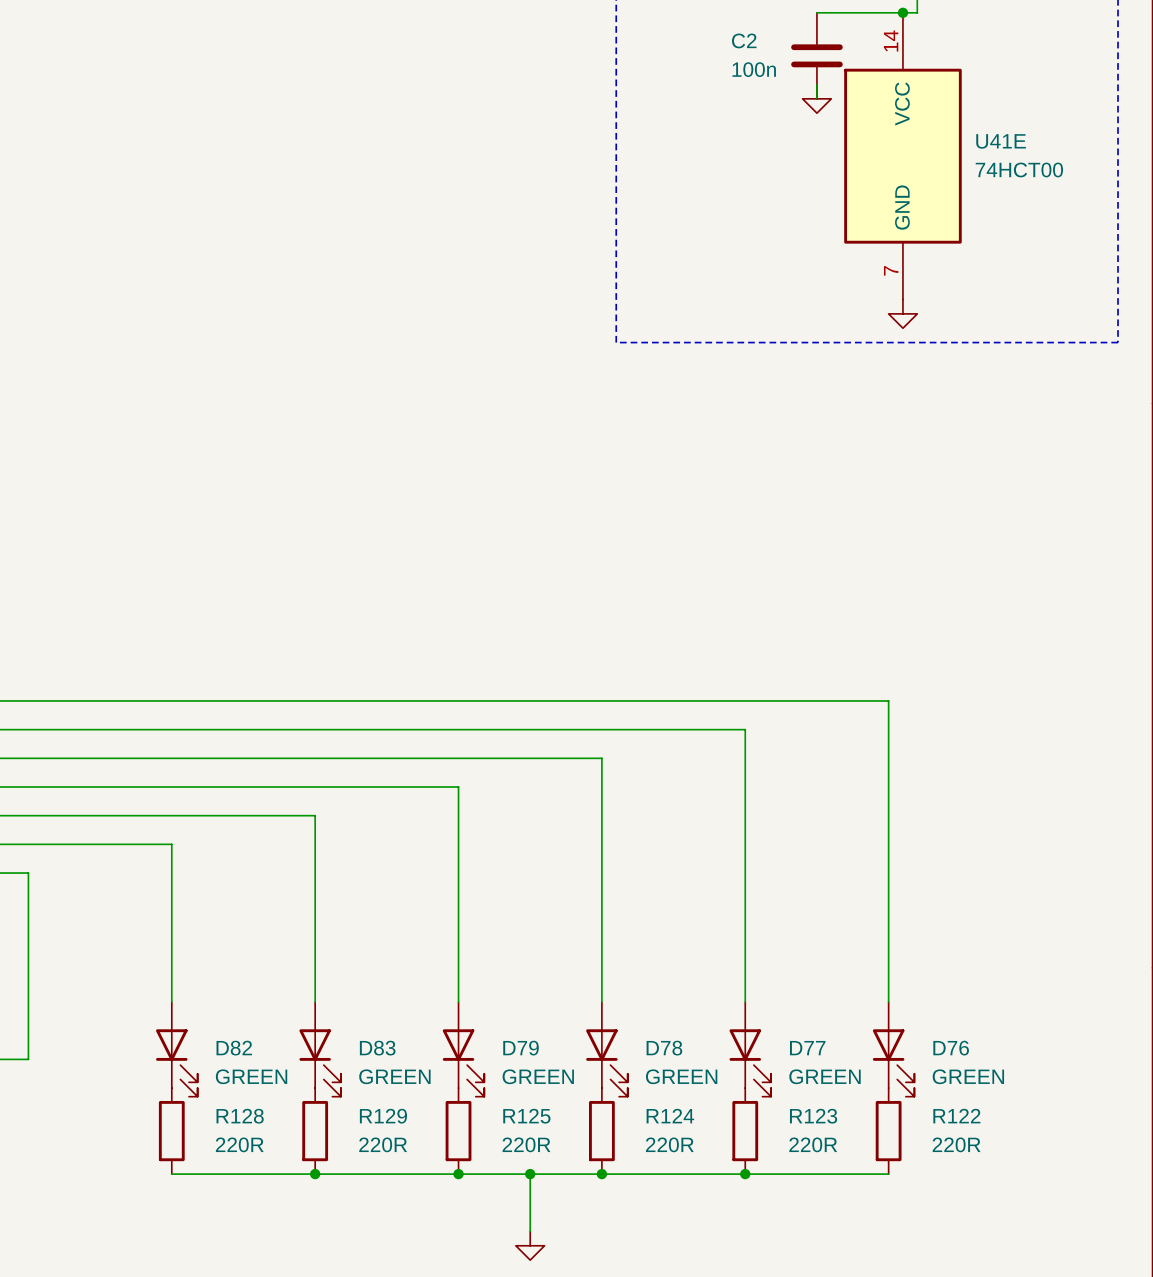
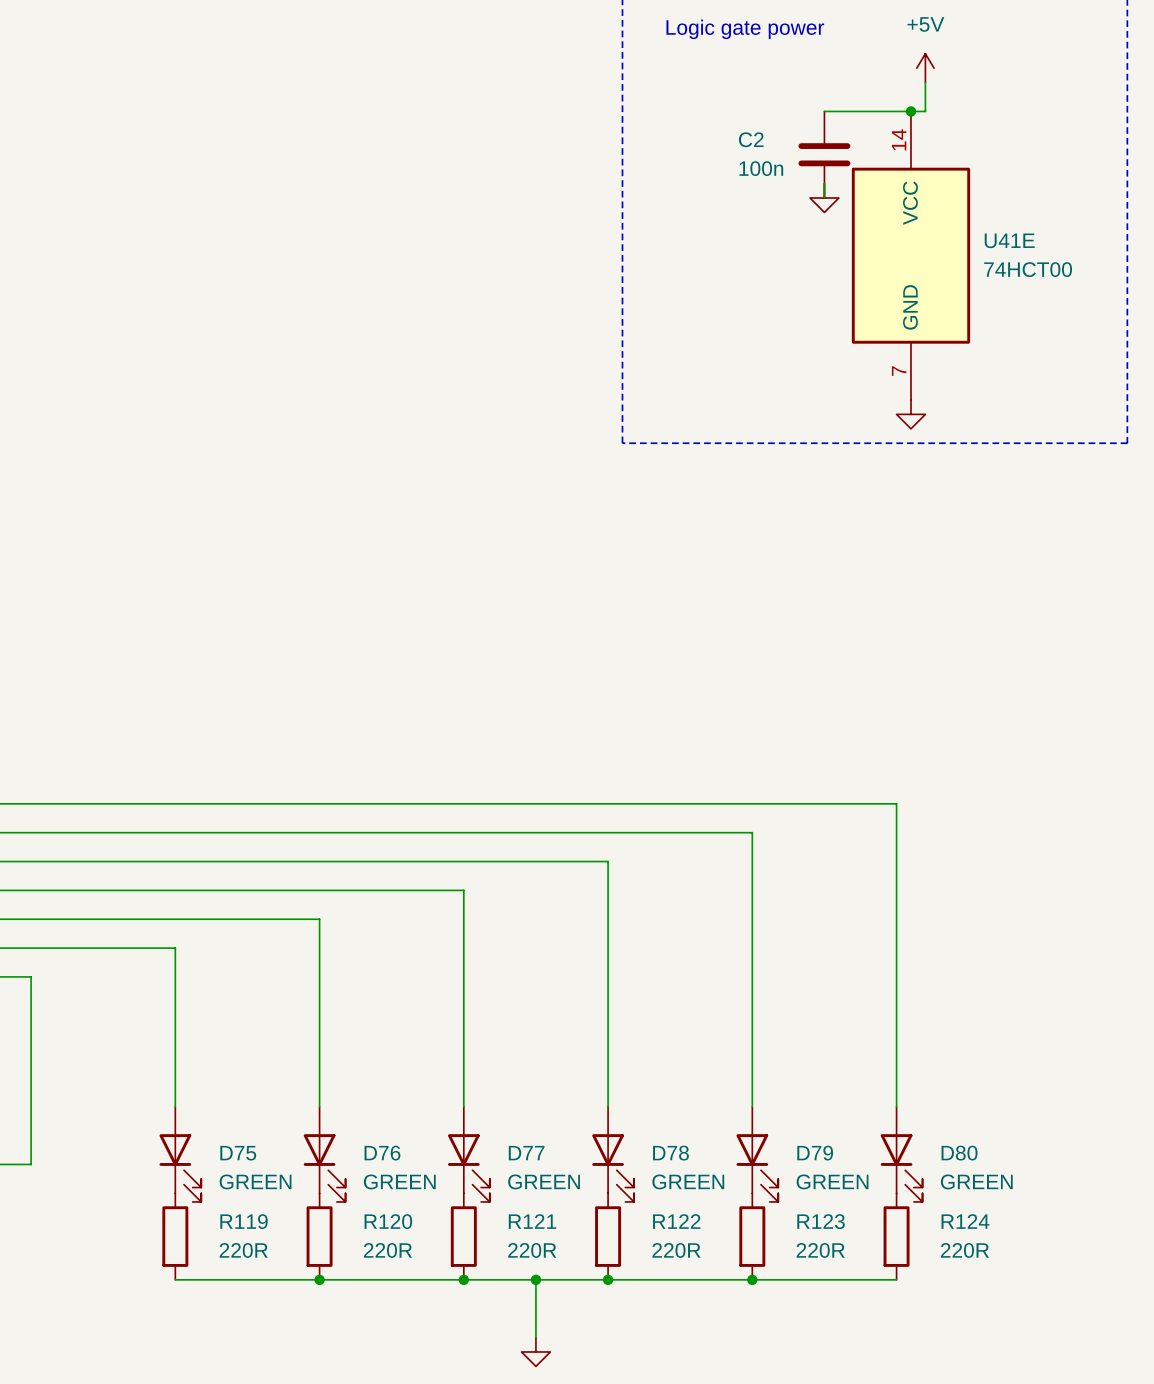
D82 name: D82 (234, 1048) -> D75 (238, 1153)
D83 name: D83 (377, 1048) -> D76 (382, 1153)
D79 name: D79 (521, 1048) -> D77 (526, 1153)
D77 name: D77 (807, 1048) -> D79 (815, 1153)
D76 name: D76 (951, 1048) -> D80 (959, 1153)
R128 name: R128 (240, 1116) -> R119 (244, 1221)
R129 name: R129 (383, 1116) -> R120 (388, 1221)
R125 name: R125 (526, 1116) -> R121 (532, 1221)
R124 name: R124 (670, 1116) -> R122 (676, 1221)
R122 name: R122 (956, 1116) -> R124 (965, 1221)

